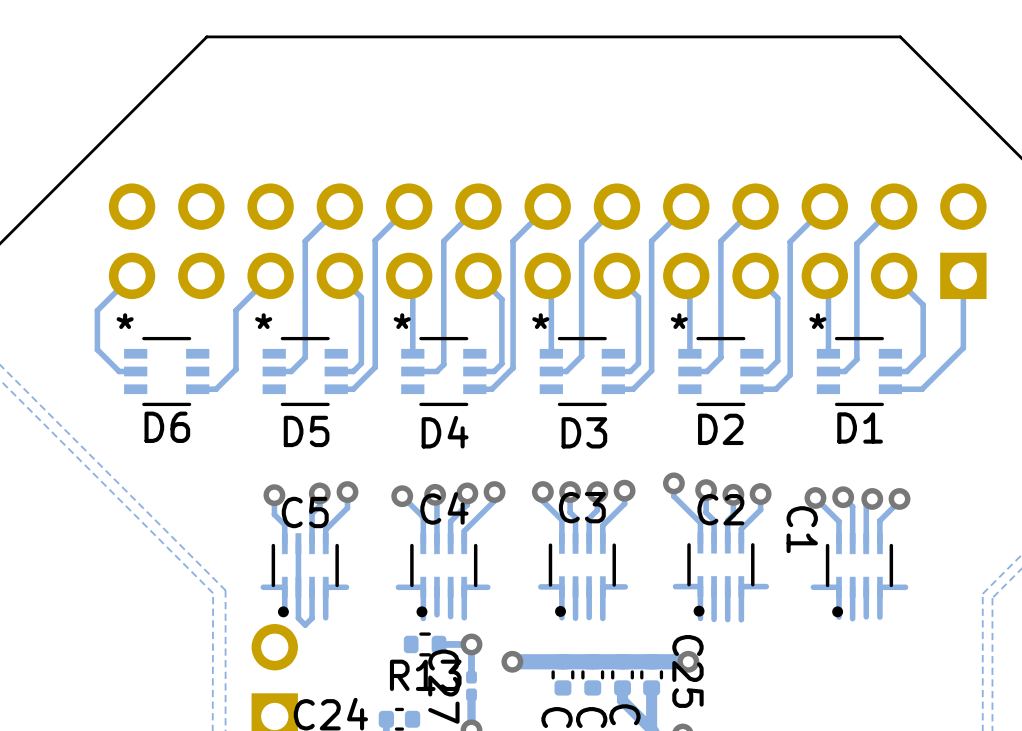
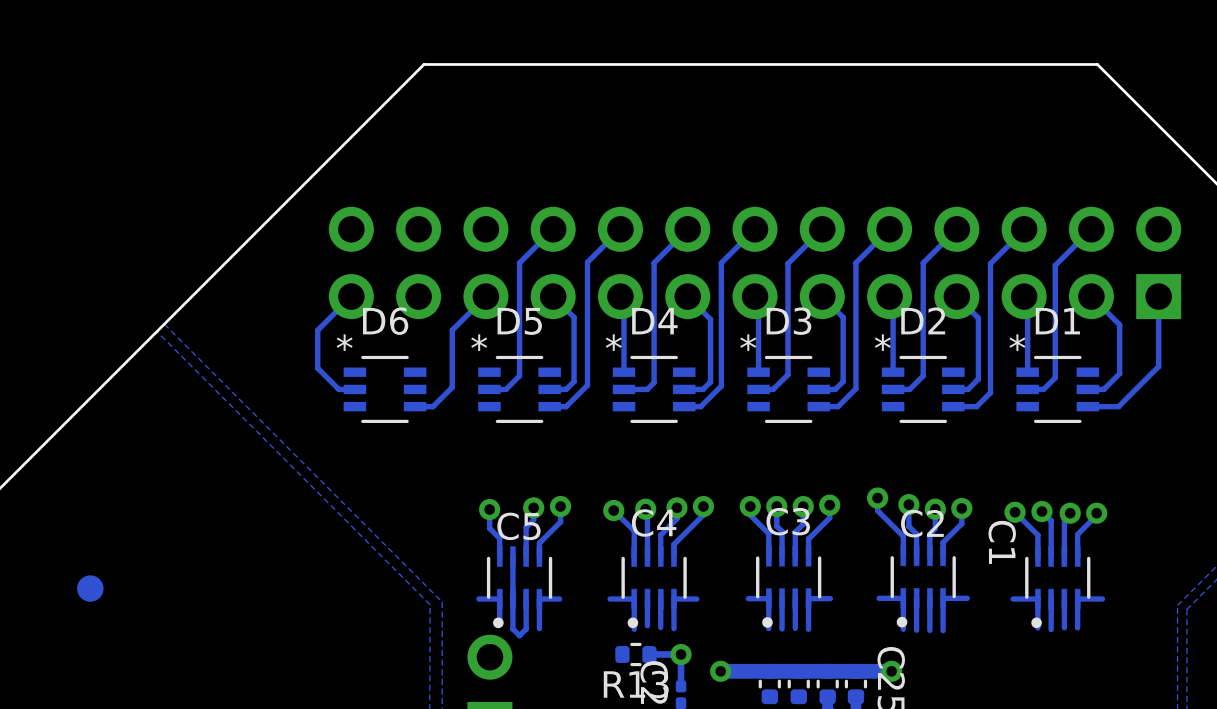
D6 name position: D6 (167, 427) -> D6 (385, 321)
D1 name position: D1 (860, 427) -> D1 (1057, 321)
D2 name position: D2 (720, 429) -> D2 (923, 320)
D5 name position: D5 (306, 431) -> D5 (519, 321)
D4 name position: D4 (445, 432) -> D4 (654, 321)
D3 name position: D3 (584, 432) -> D3 (788, 321)

